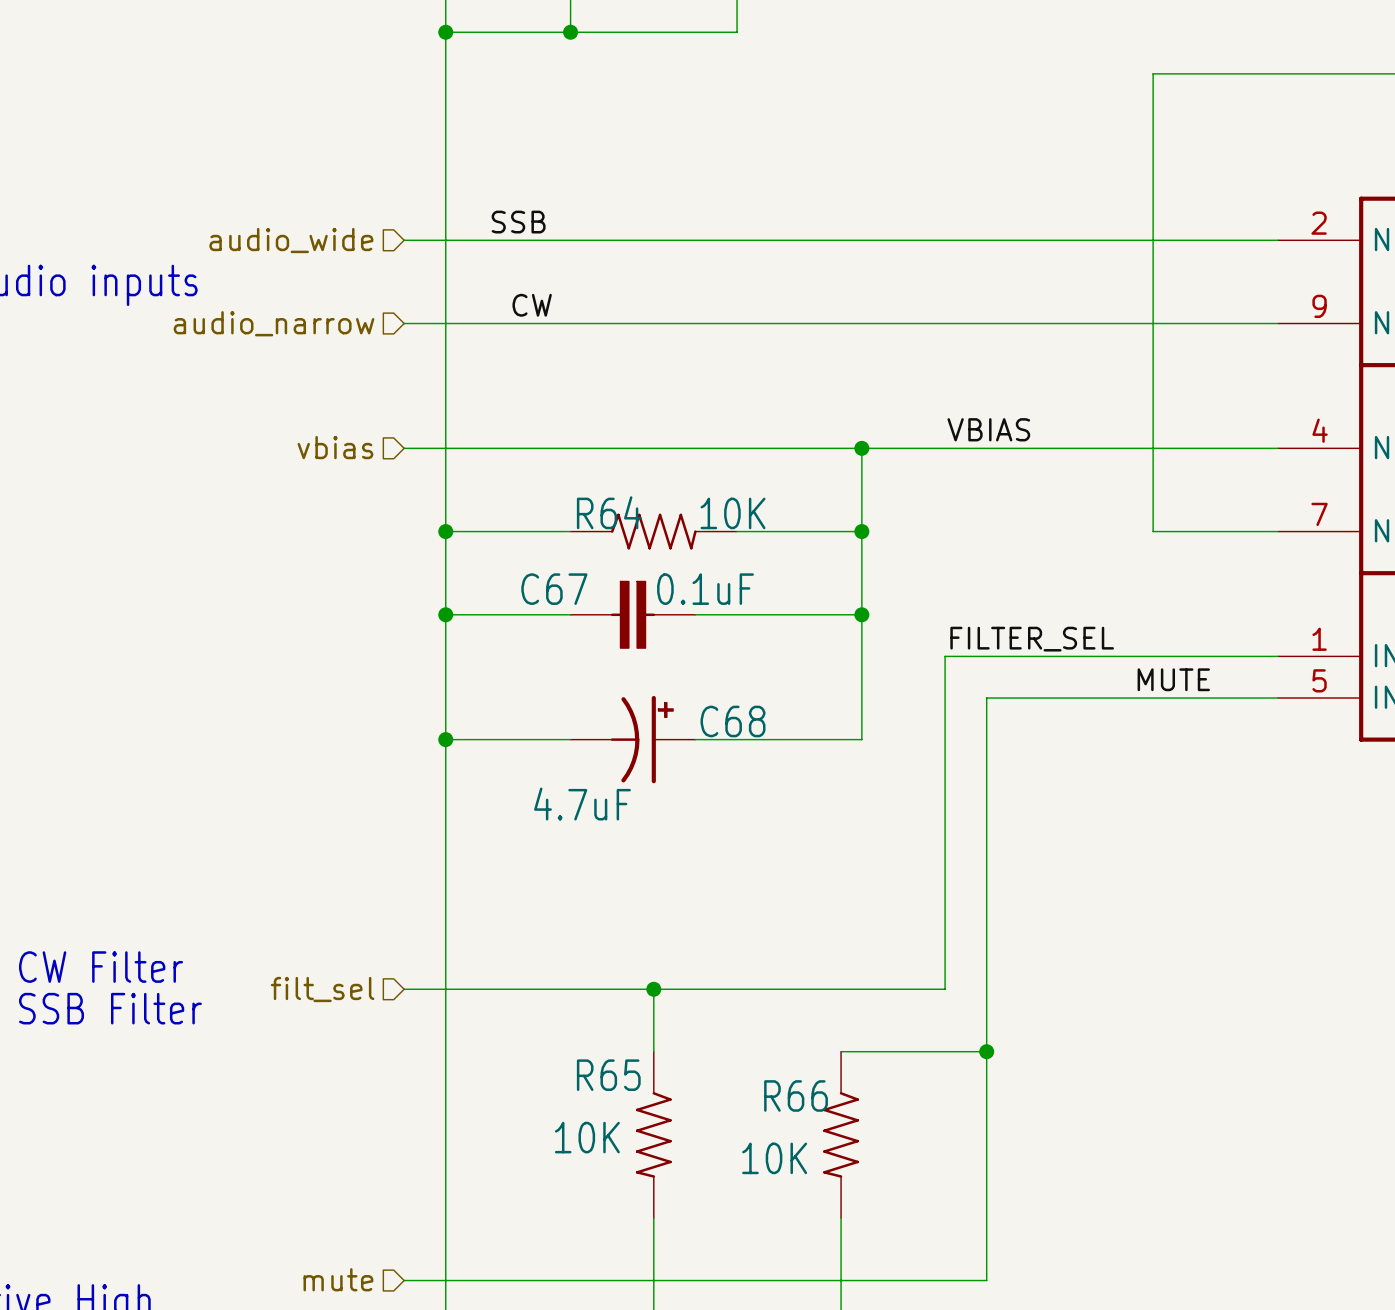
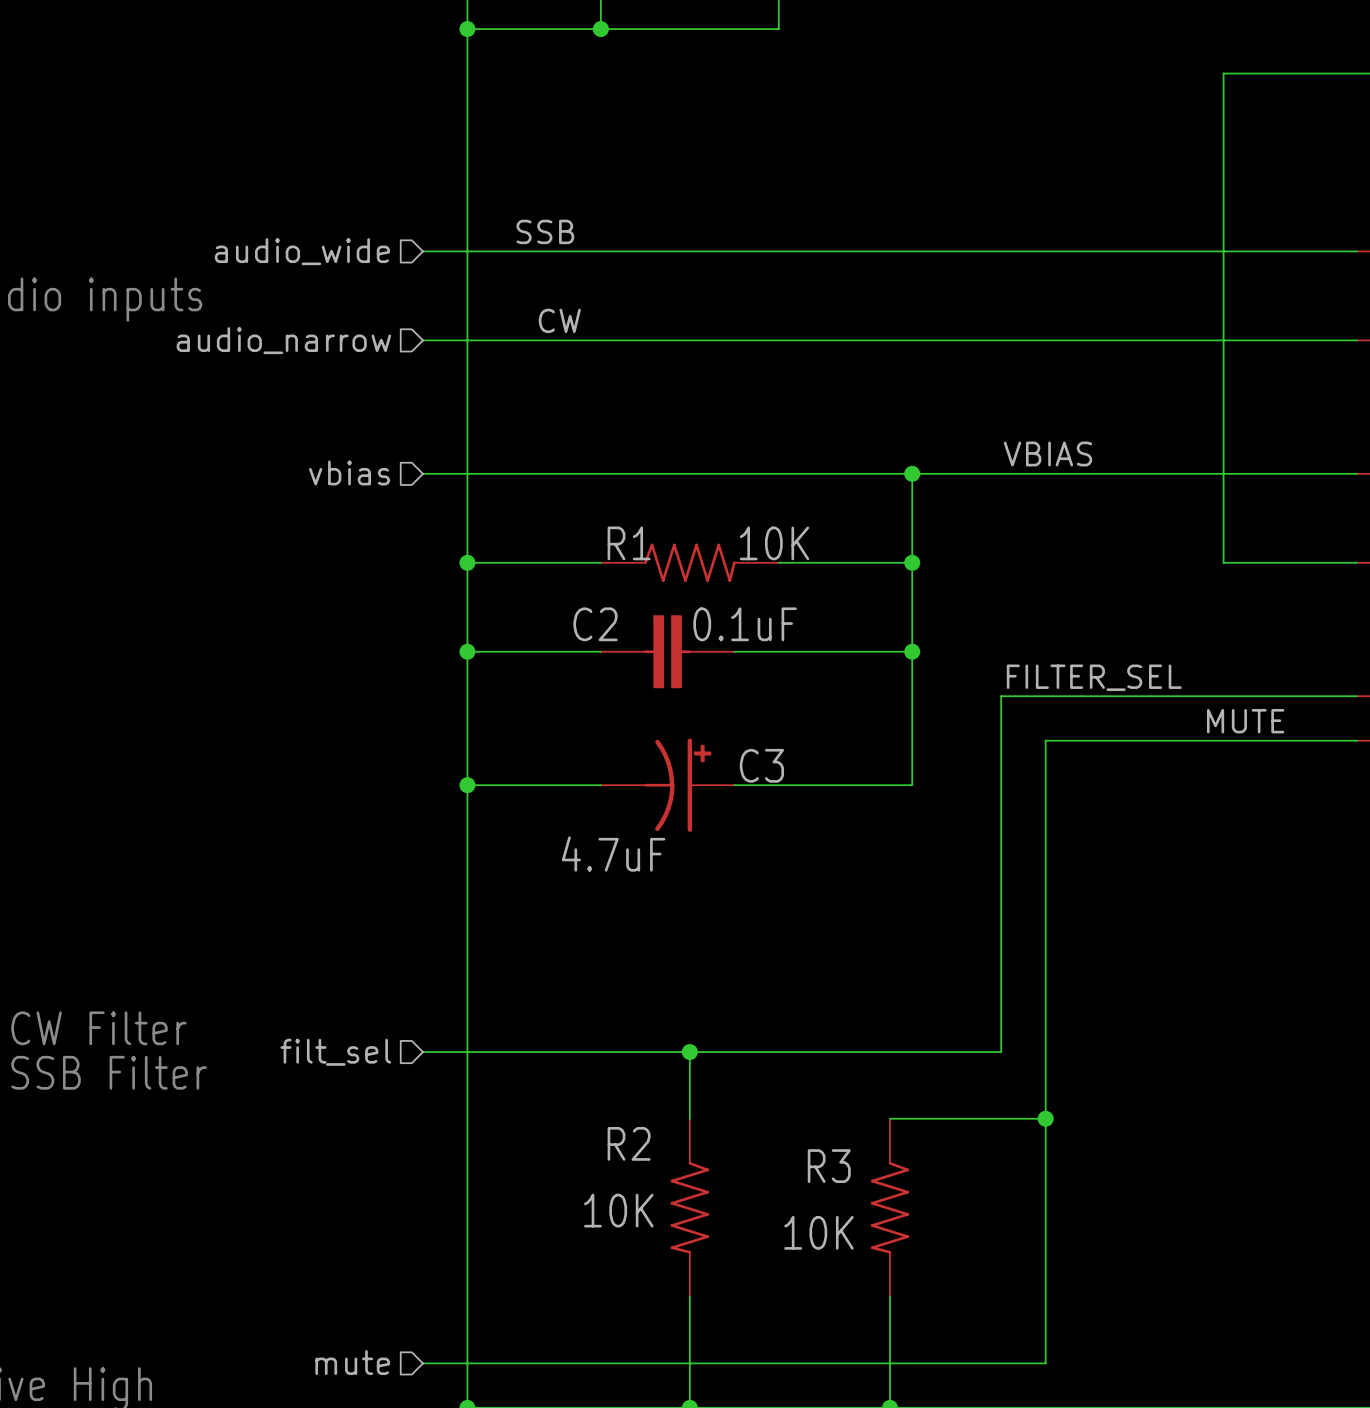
R64 name: R64 (609, 512) -> R1 (629, 543)
C67 name: C67 (554, 589) -> C2 (595, 624)
C68 name: C68 (733, 721) -> C3 (761, 765)
R65 name: R65 (608, 1075) -> R2 (629, 1143)
R66 name: R66 (796, 1095) -> R3 (829, 1166)

